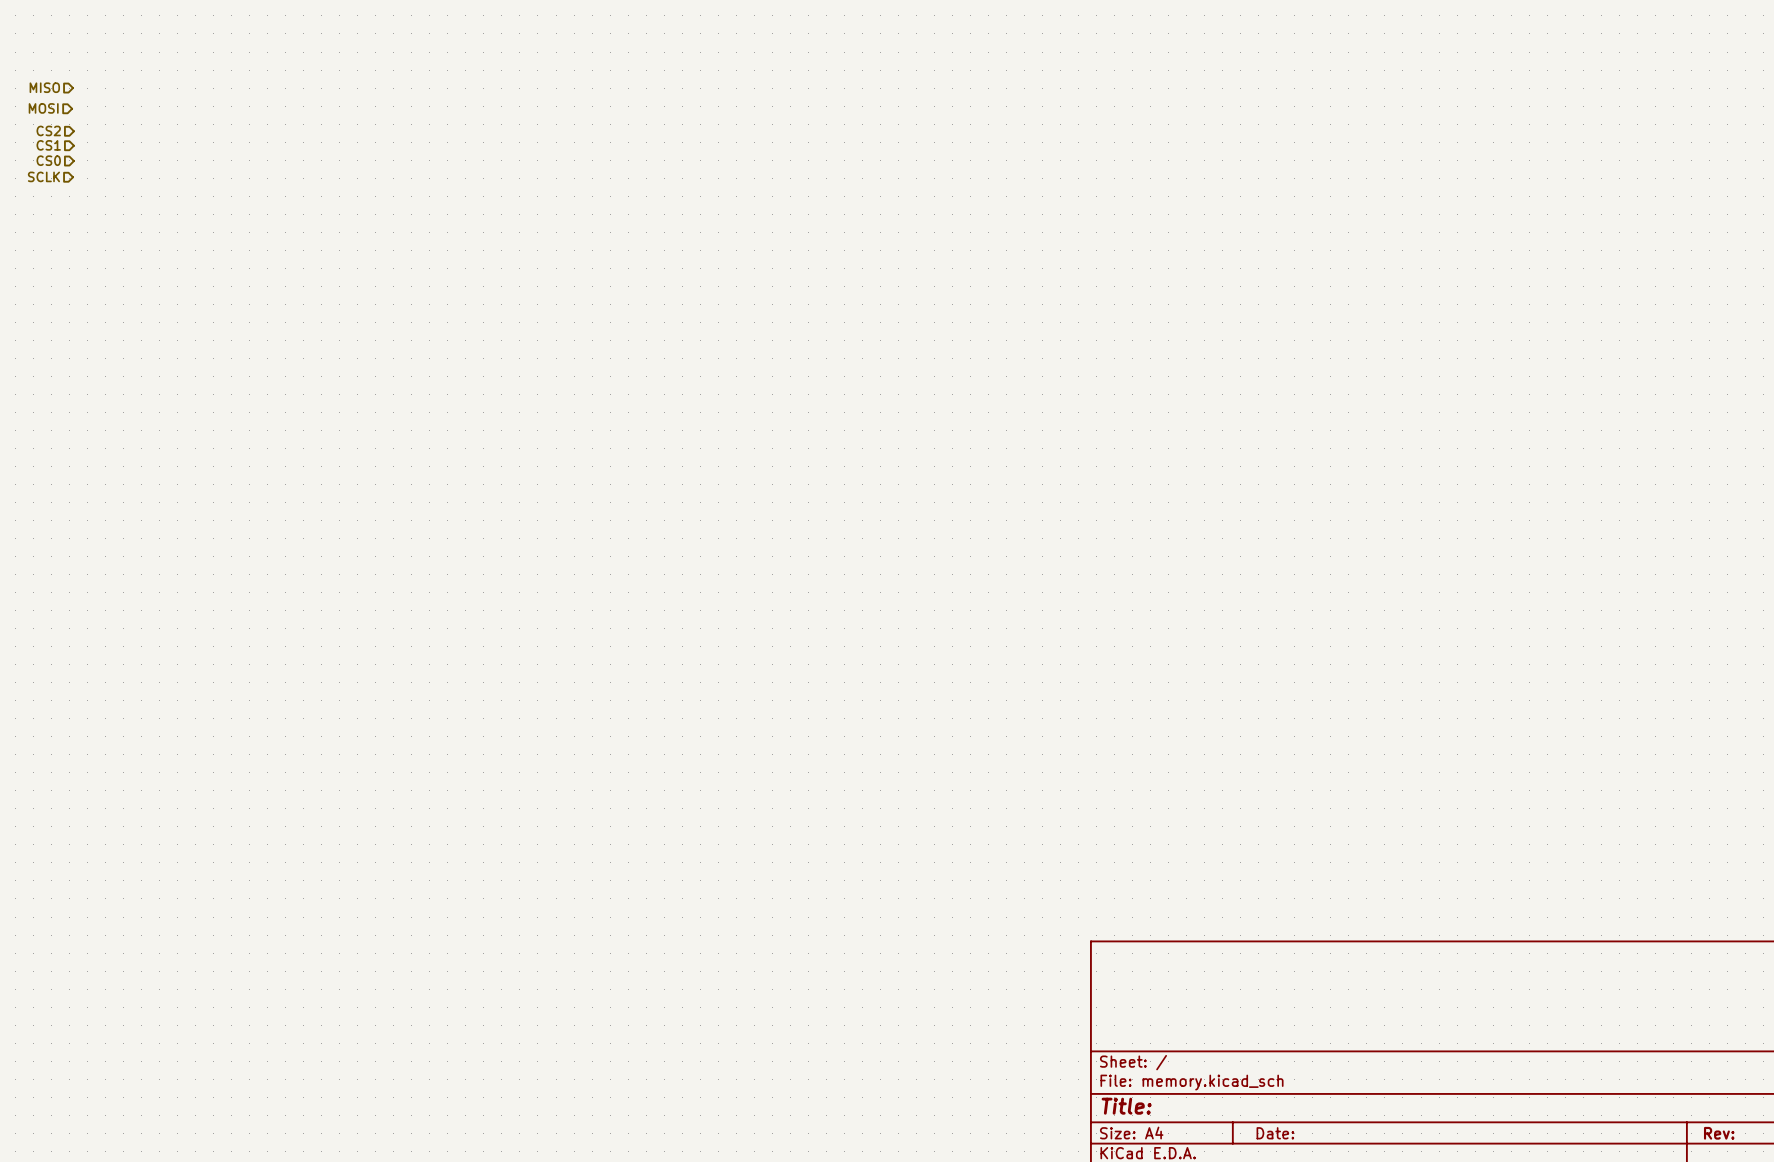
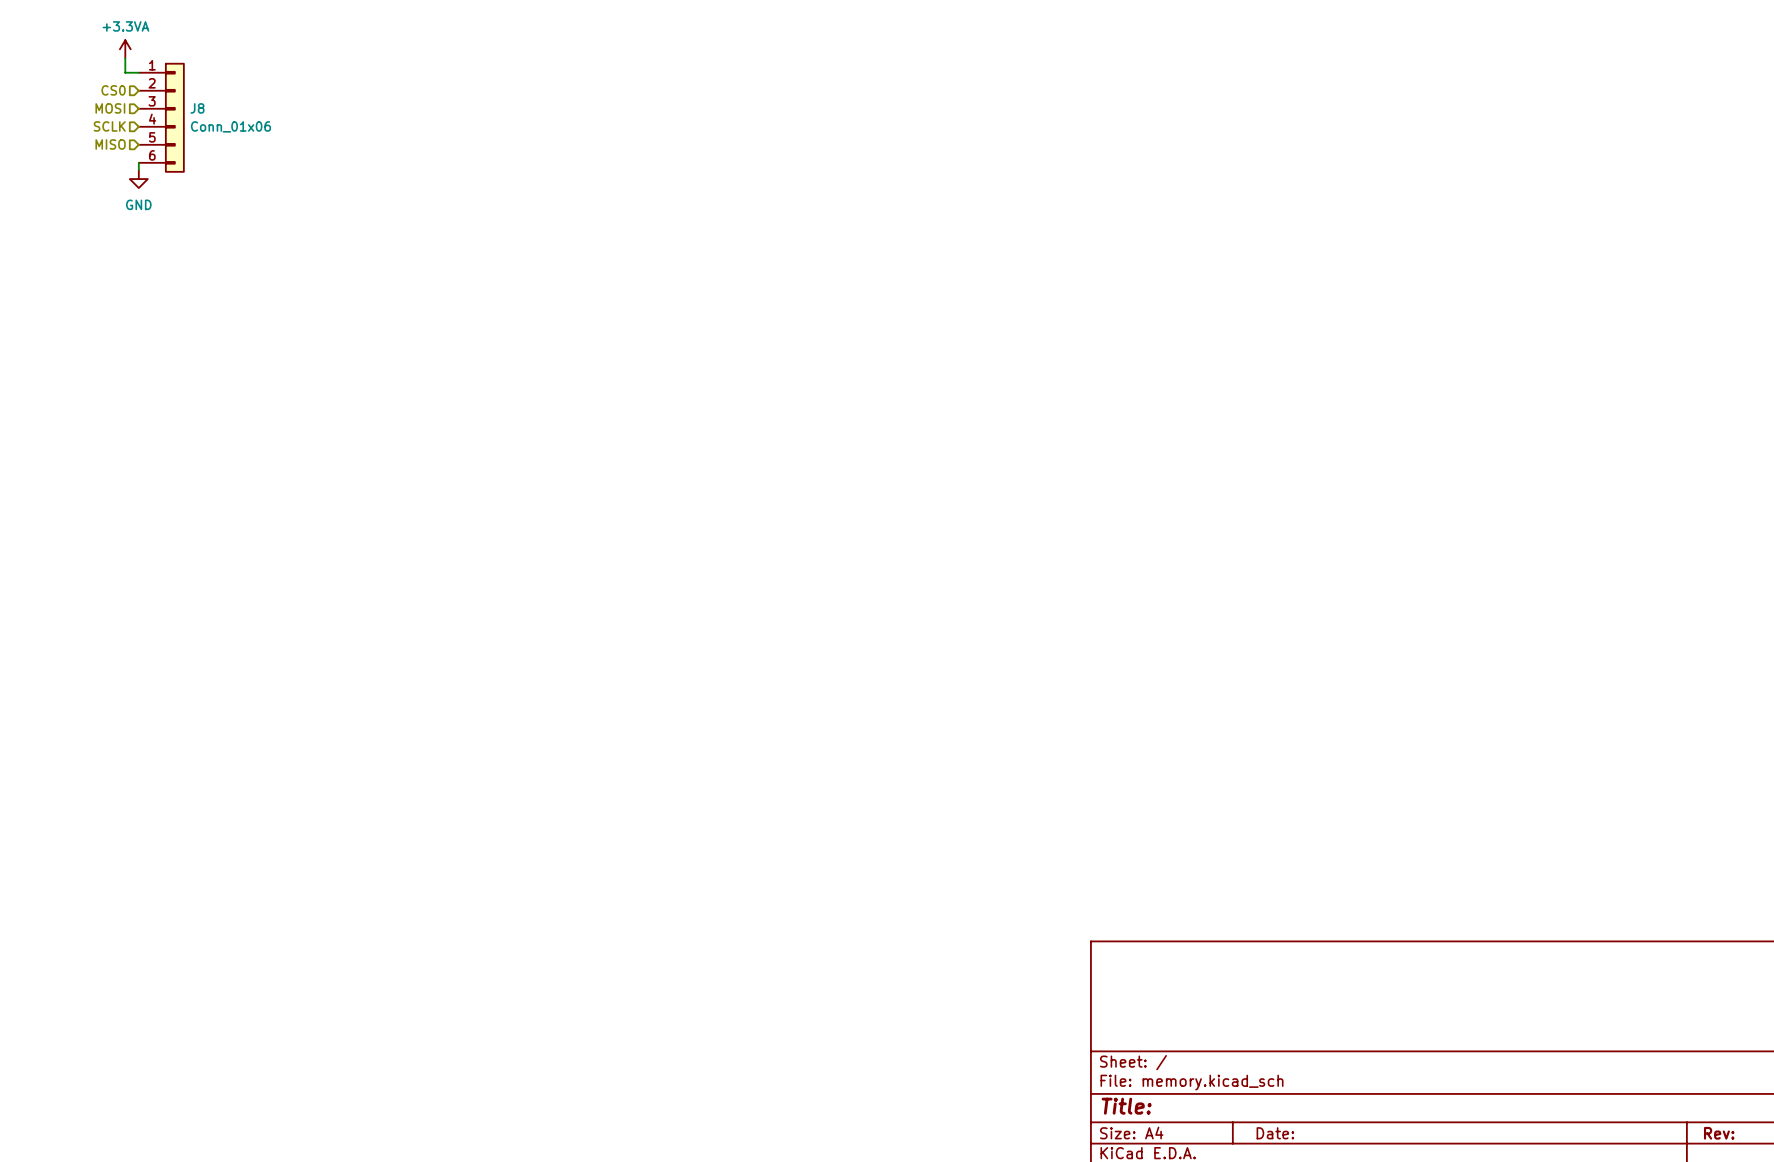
power symbol: none -> +3.3VA (125, 49)
wire: none -> (125, 58) (125, 72) (138, 72)
hierarchical label position: MISO (44, 87) -> MISO (110, 144)
hierarchical label position: MOSI (43, 108) -> MOSI (110, 108)
J8: none -> Conn_01x06 (161, 117)
hierarchical label: CS2 (48, 130) -> none
hierarchical label: CS1 (48, 145) -> none
hierarchical label position: CS0 (48, 160) -> CS0 (113, 90)
wire: none -> (138, 162) (138, 170)
hierarchical label position: SCLK (43, 176) -> SCLK (109, 126)
power symbol: none -> GND (138, 179)

